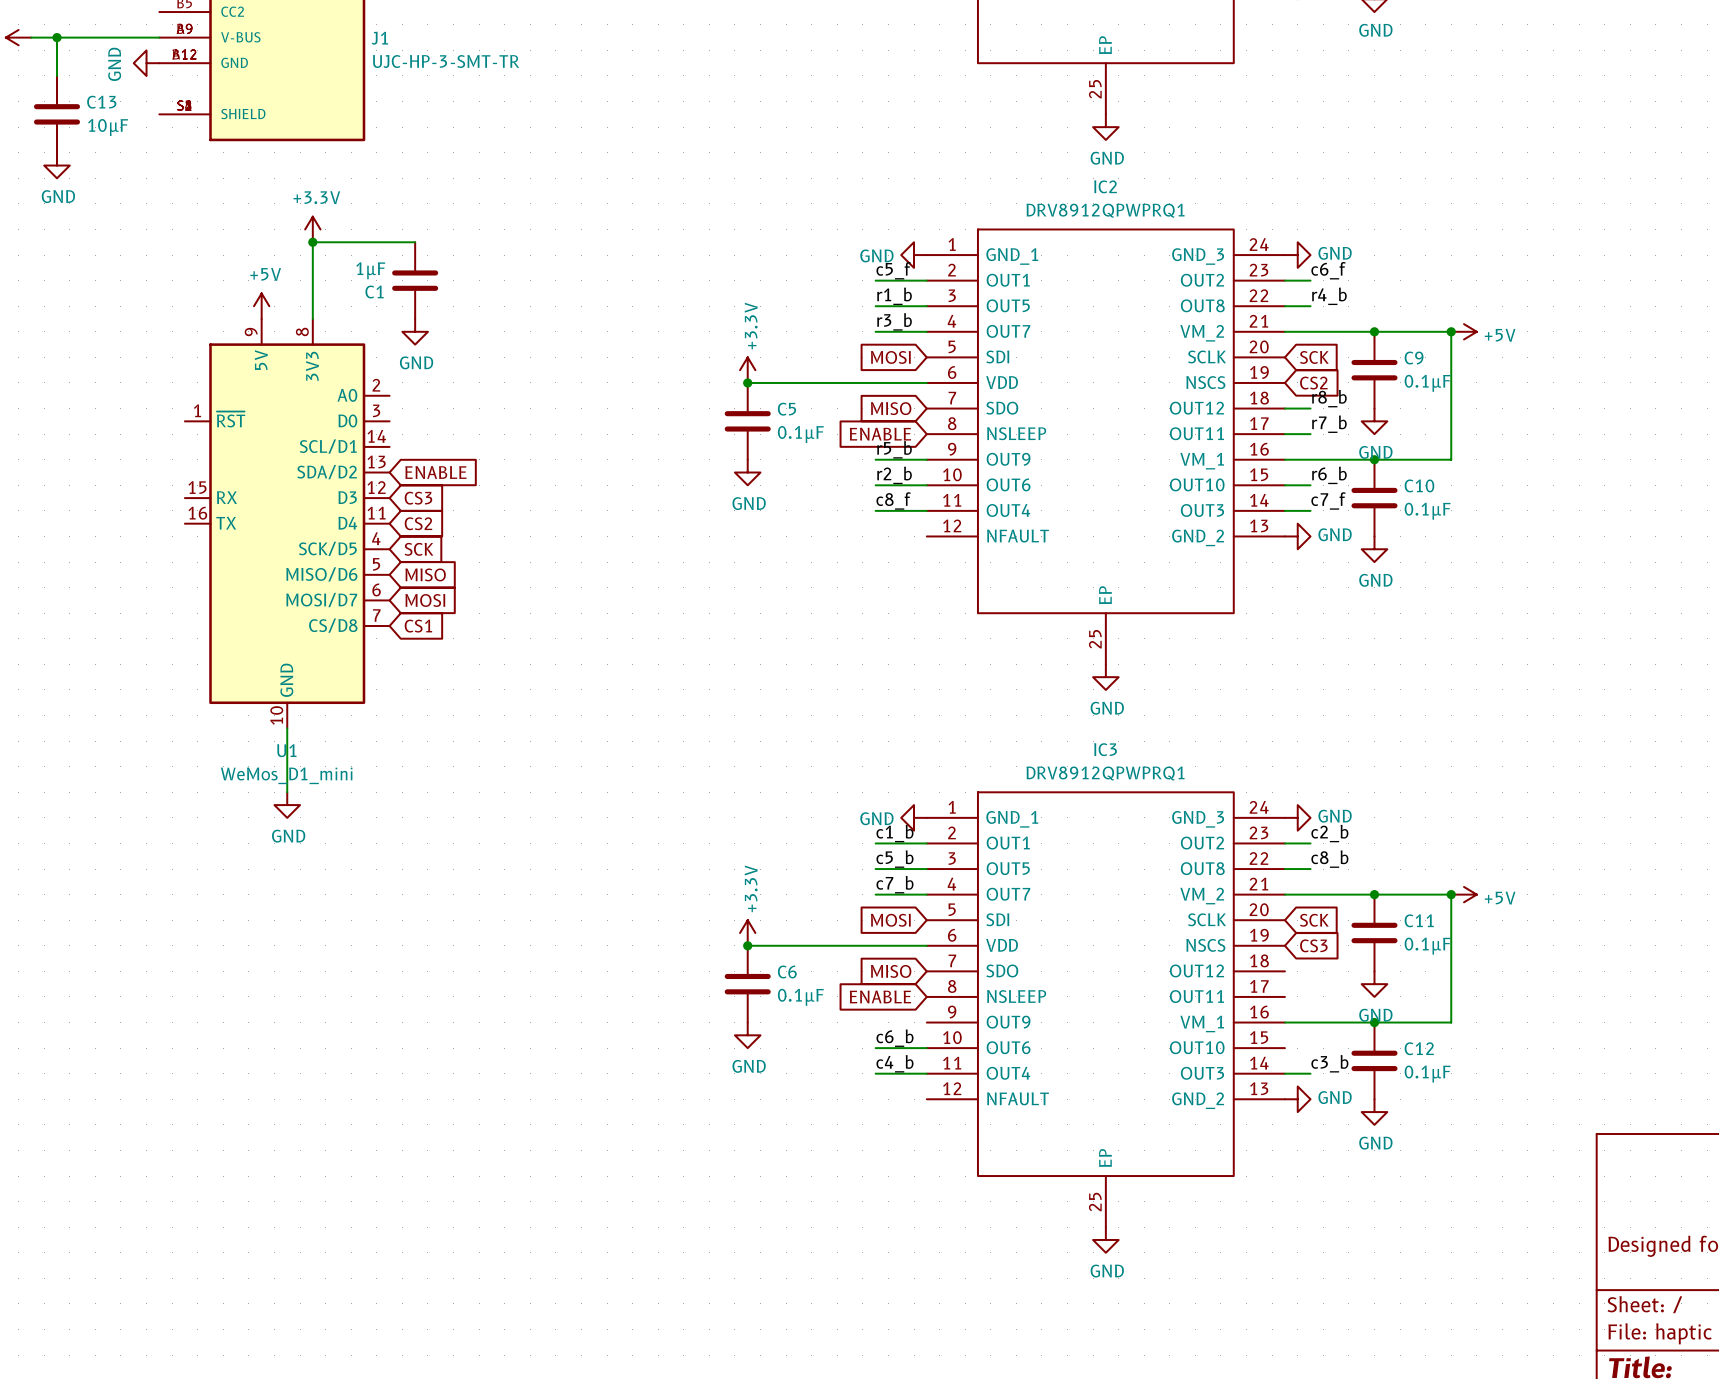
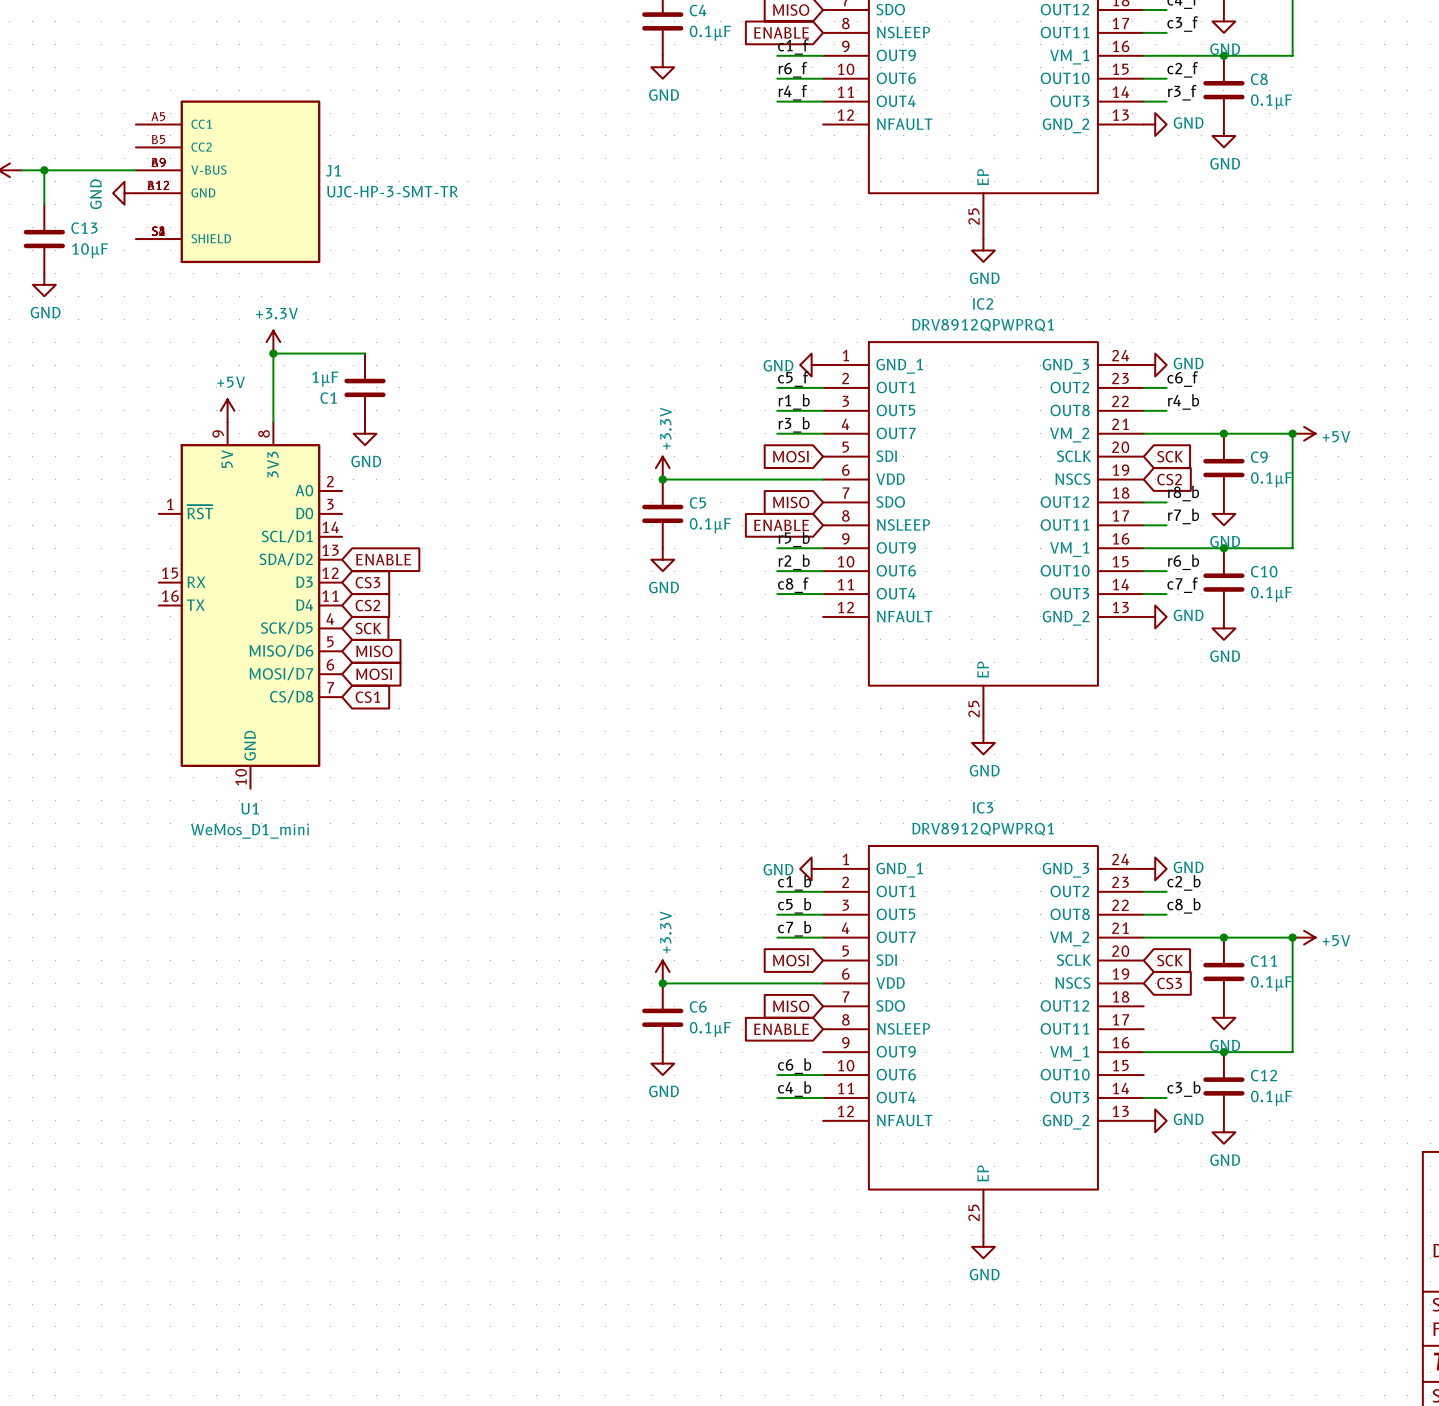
wire: (287, 728) (287, 792) -> none
power symbol: GND (287, 805) -> none

